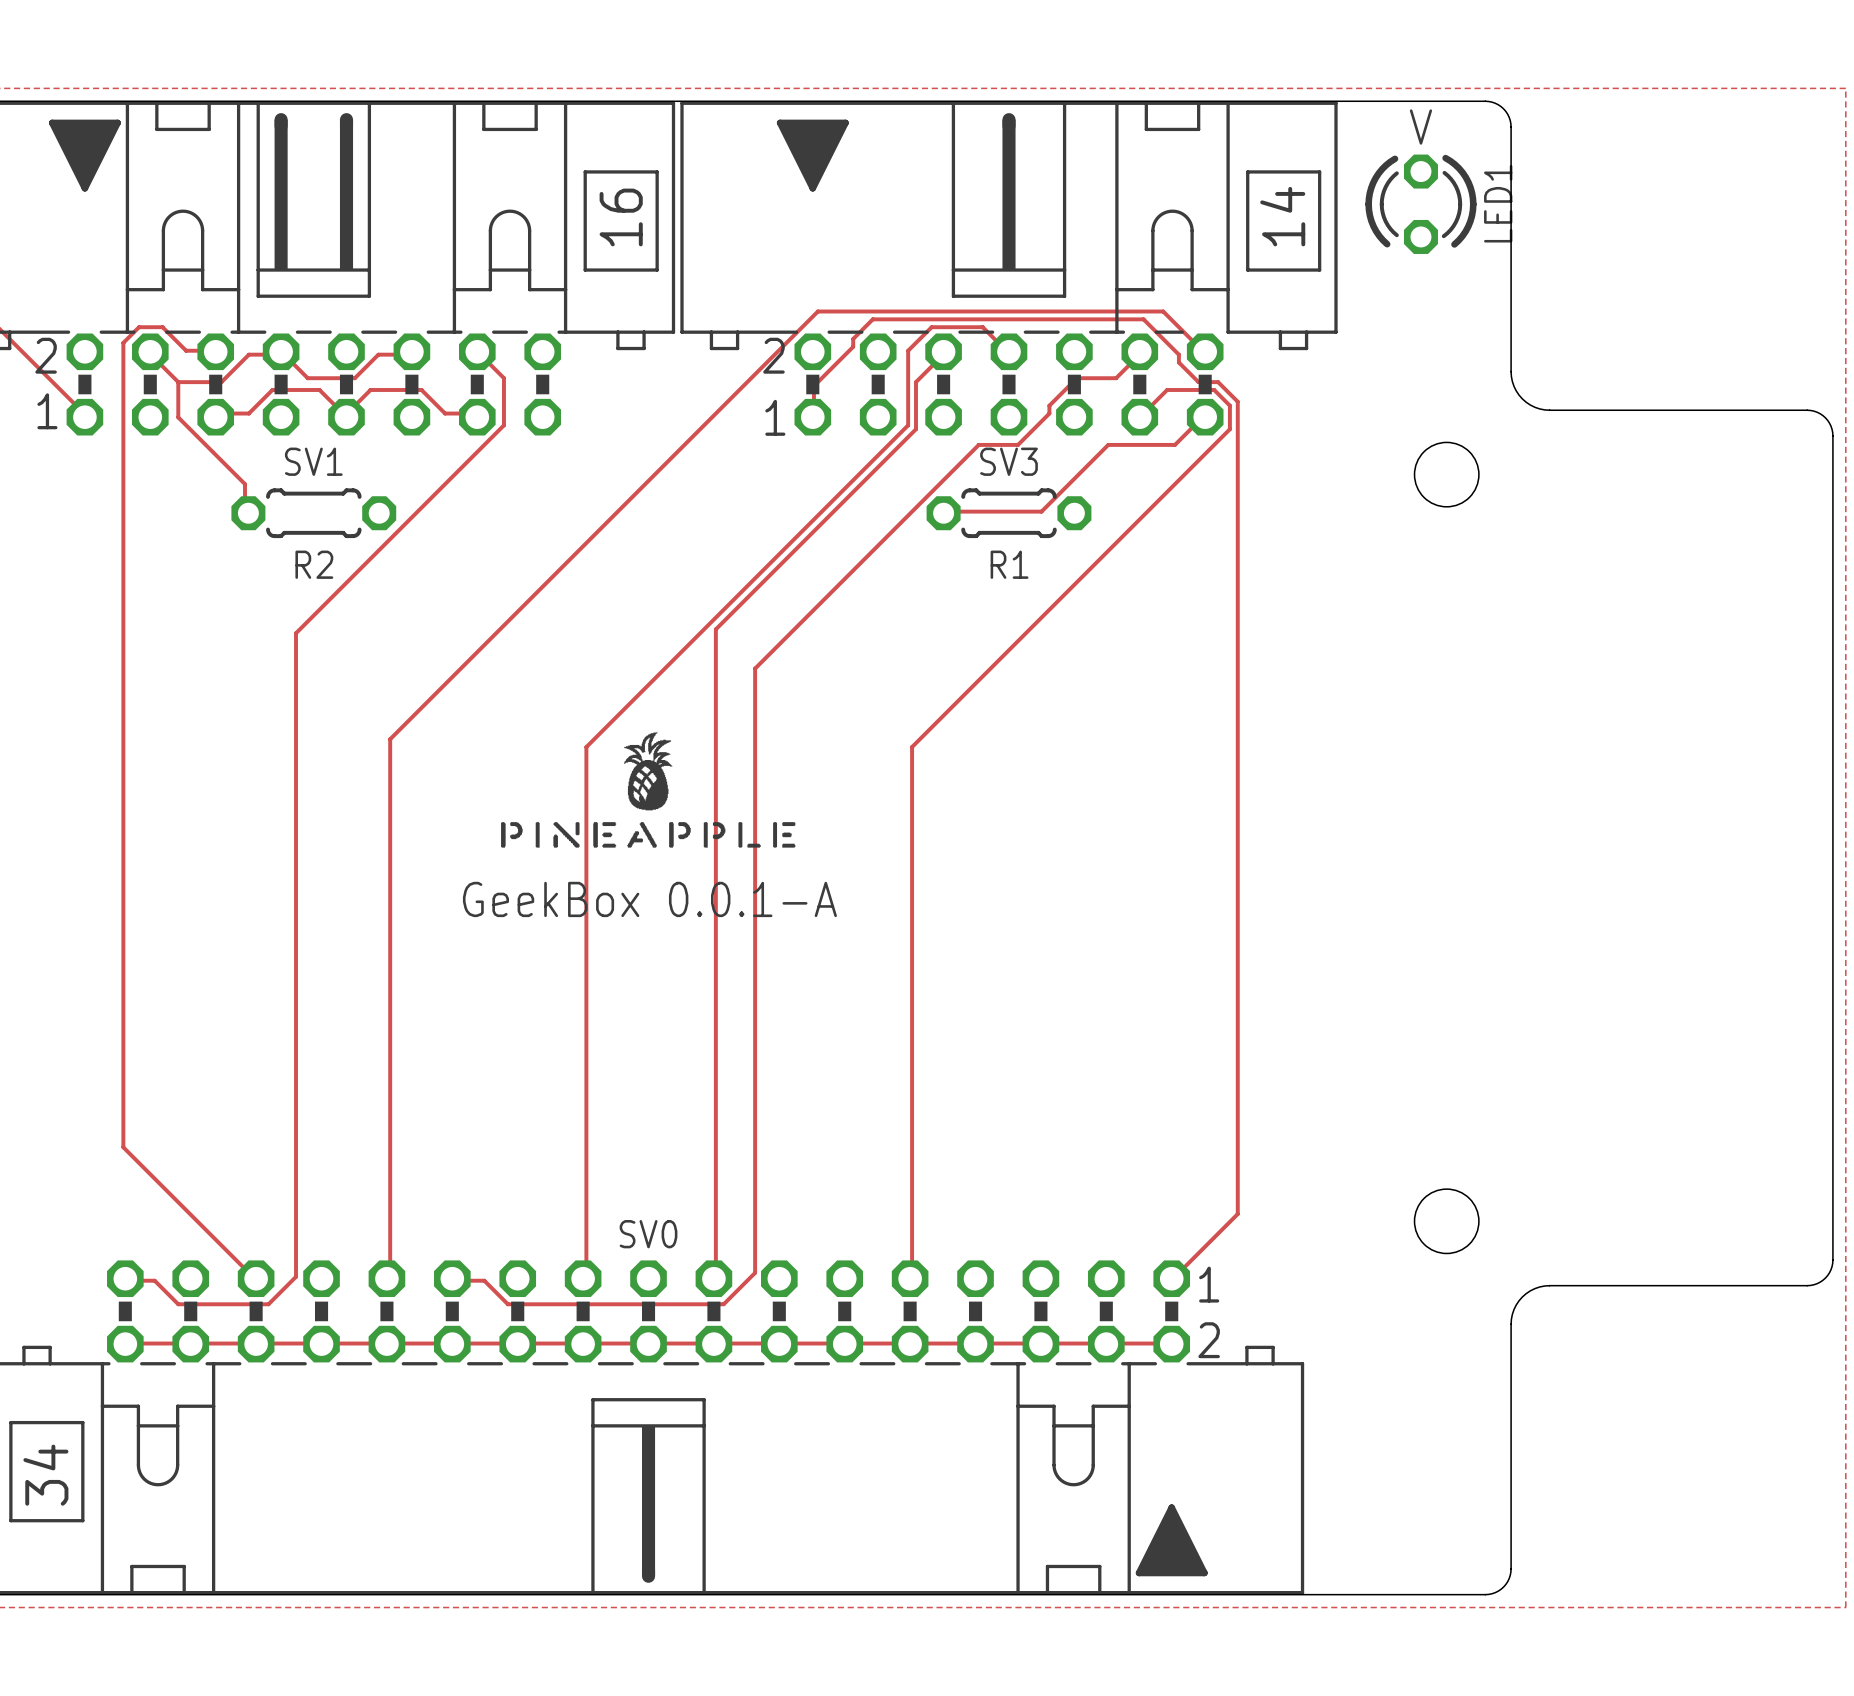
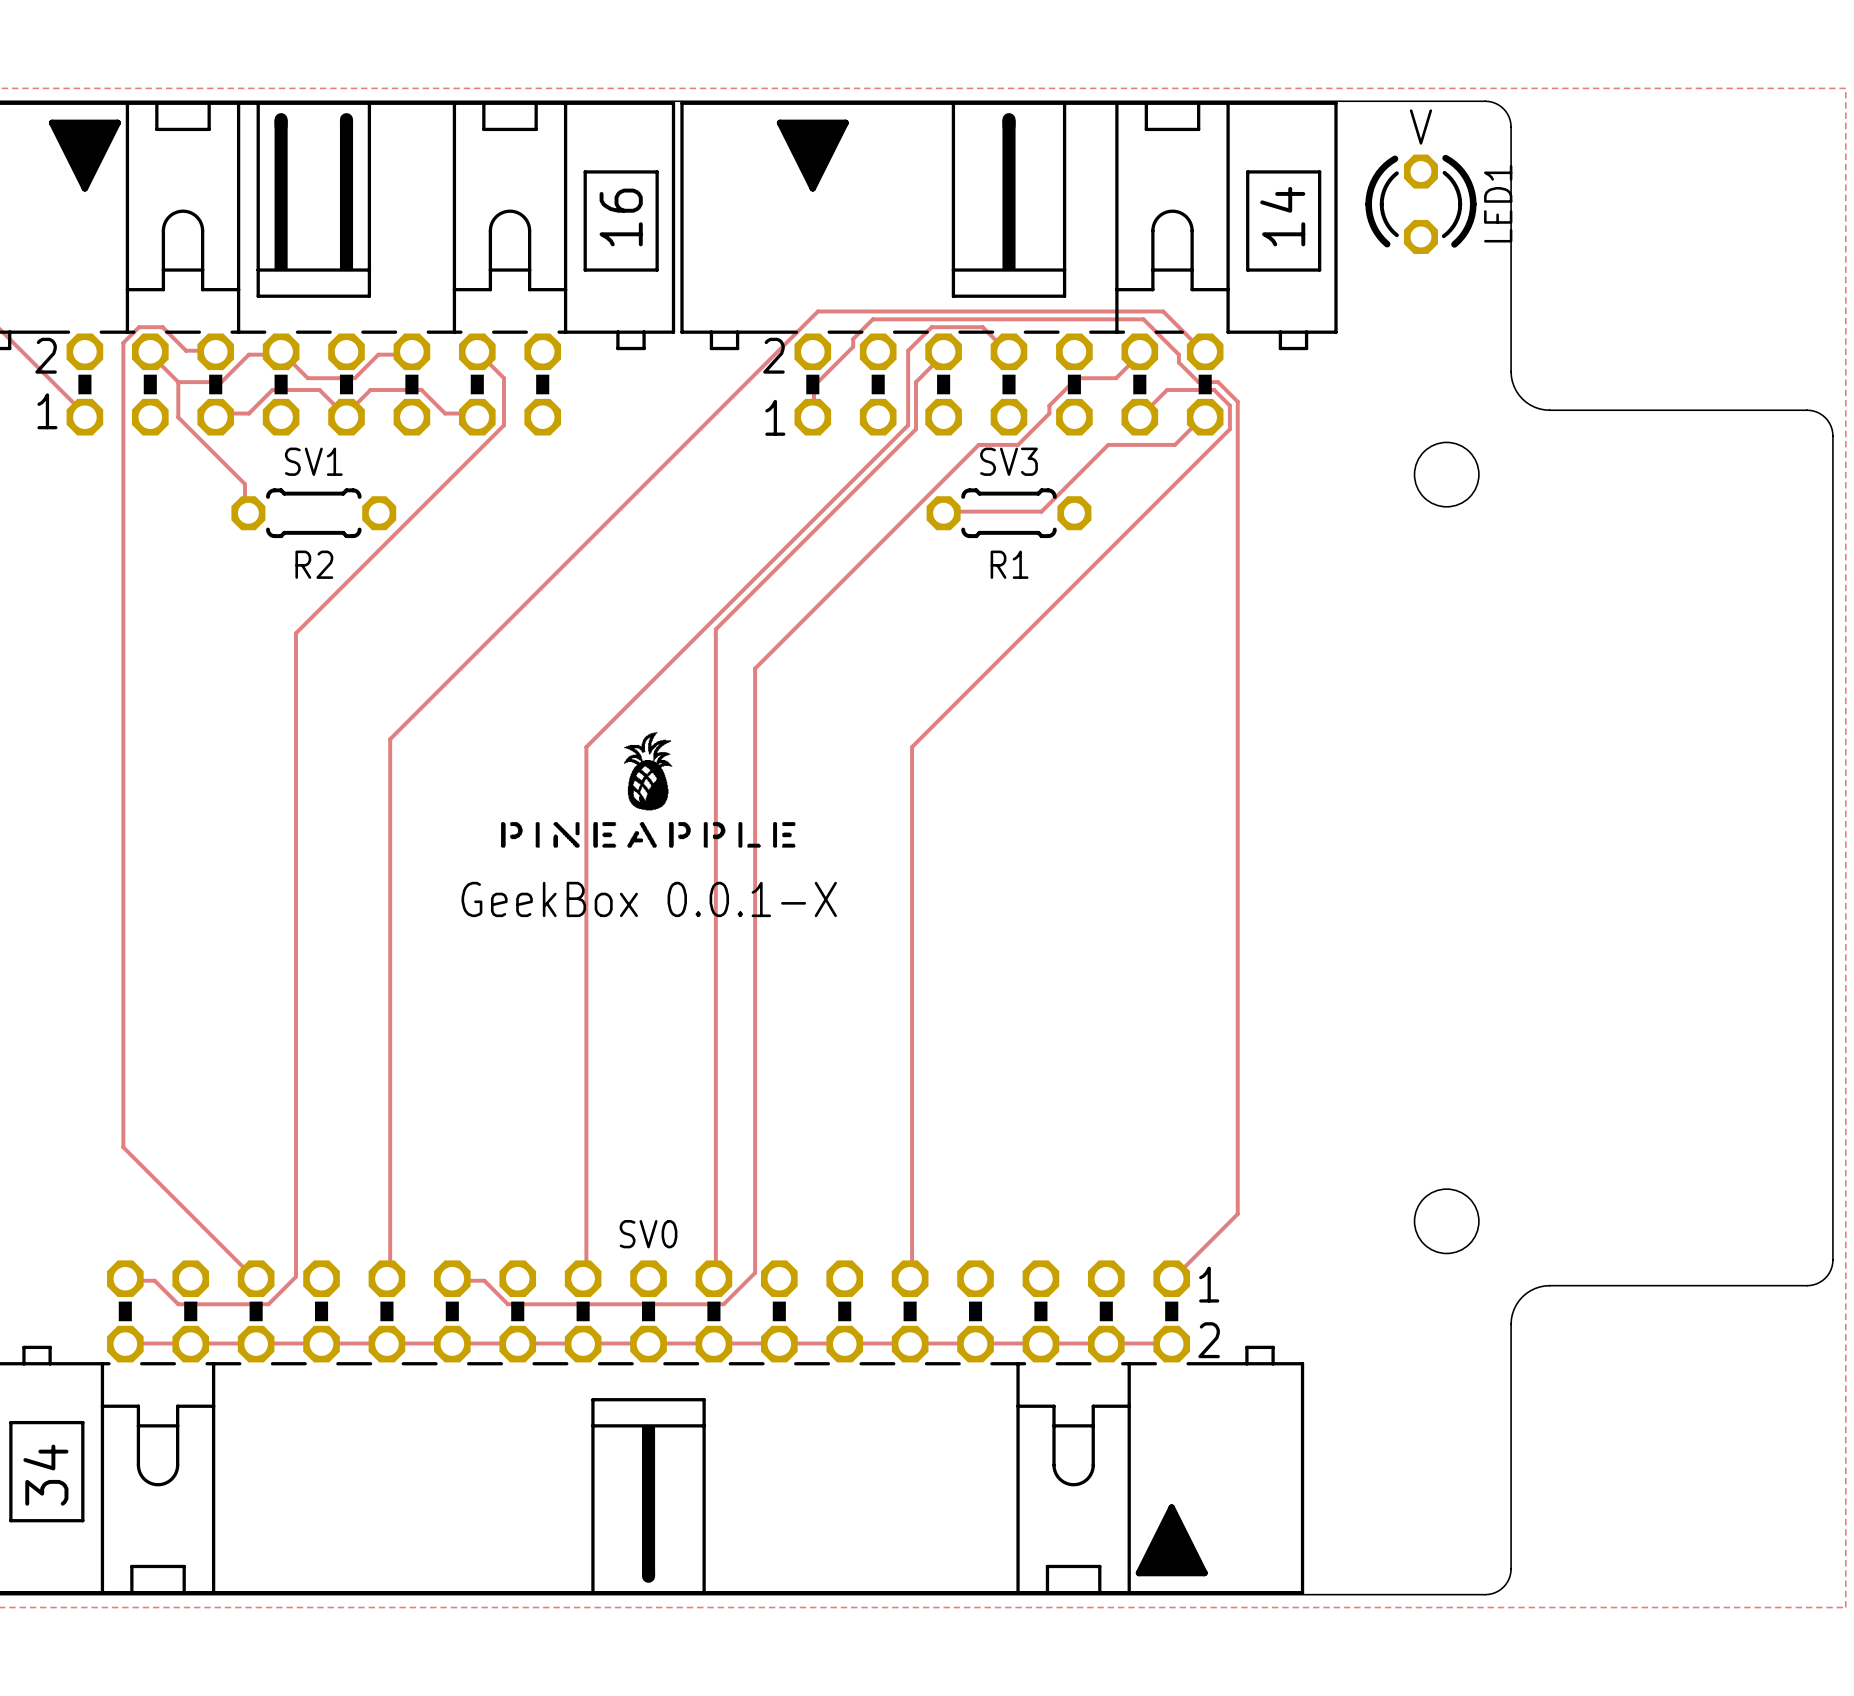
text: GeekBox 0.0.1-A (649, 899) -> GeekBox 0.0.1-X (649, 899)

